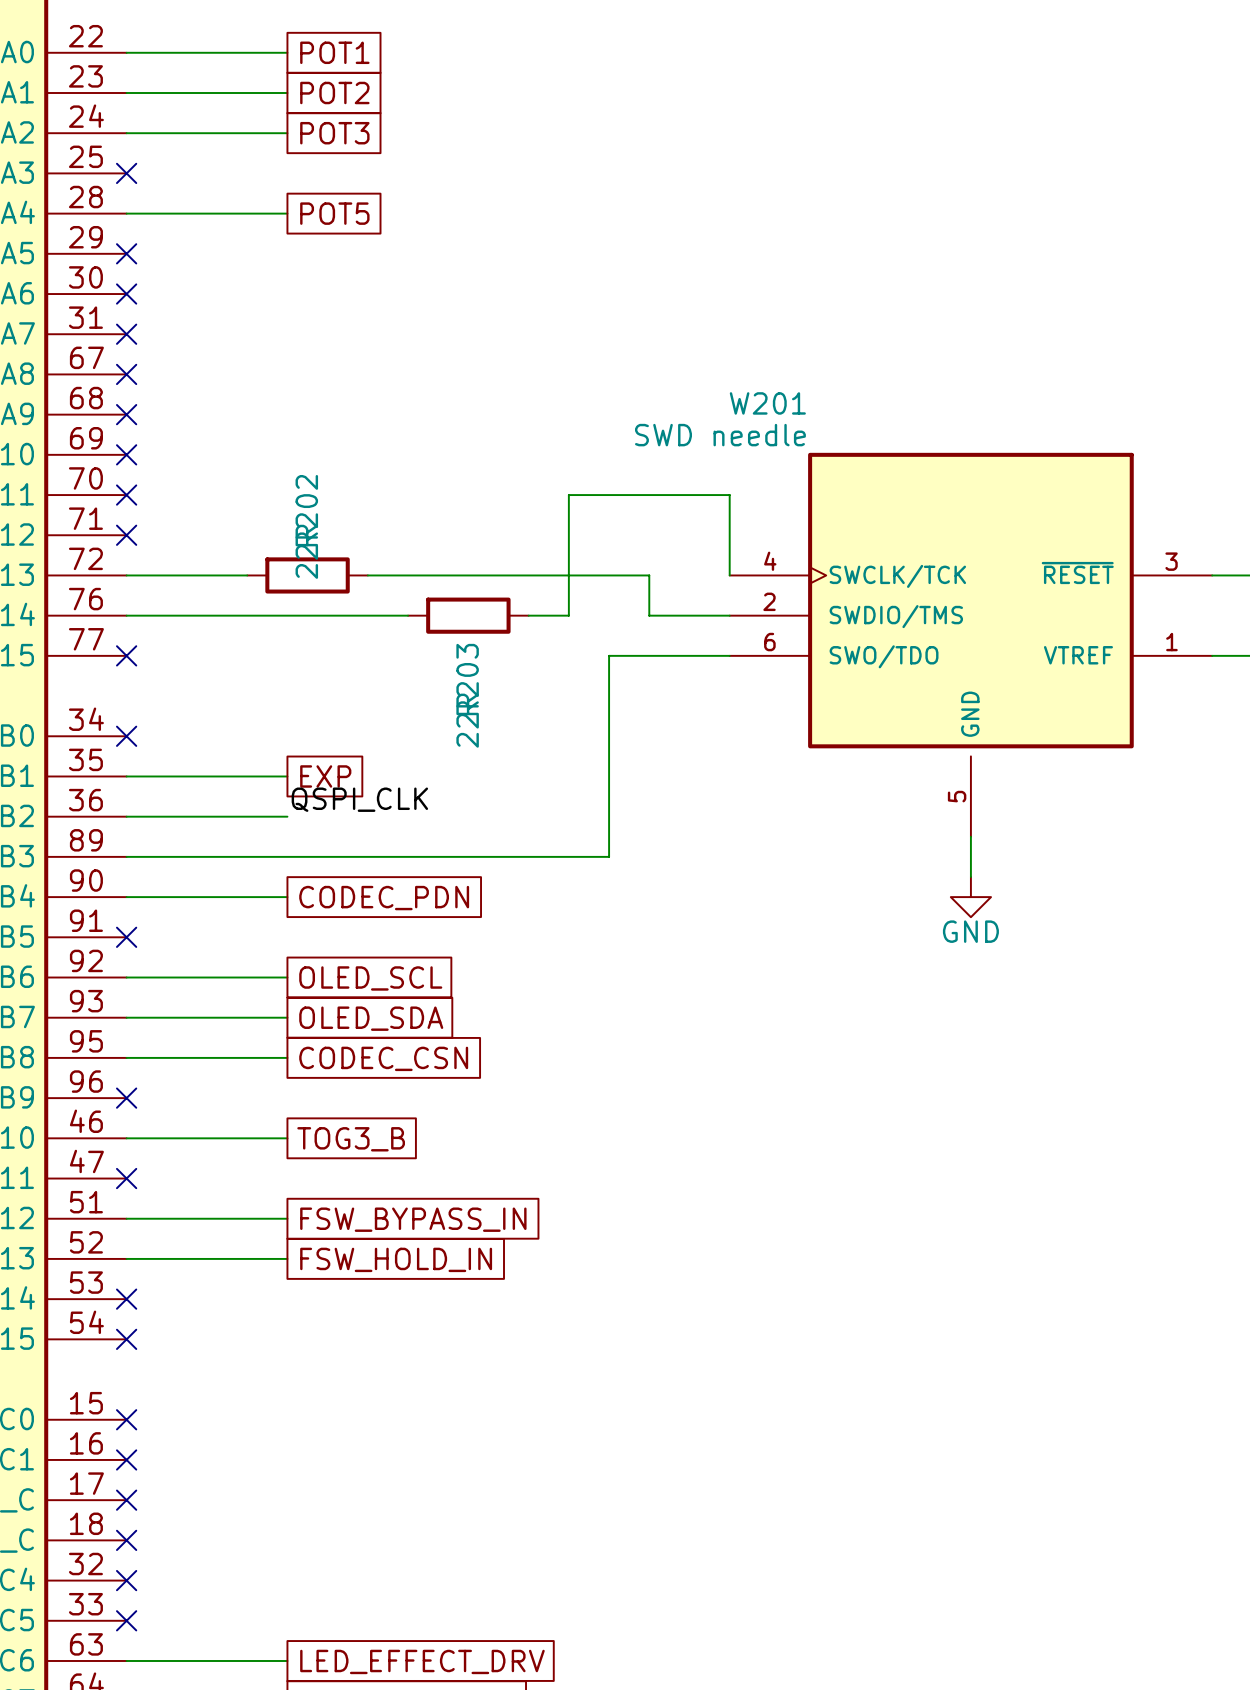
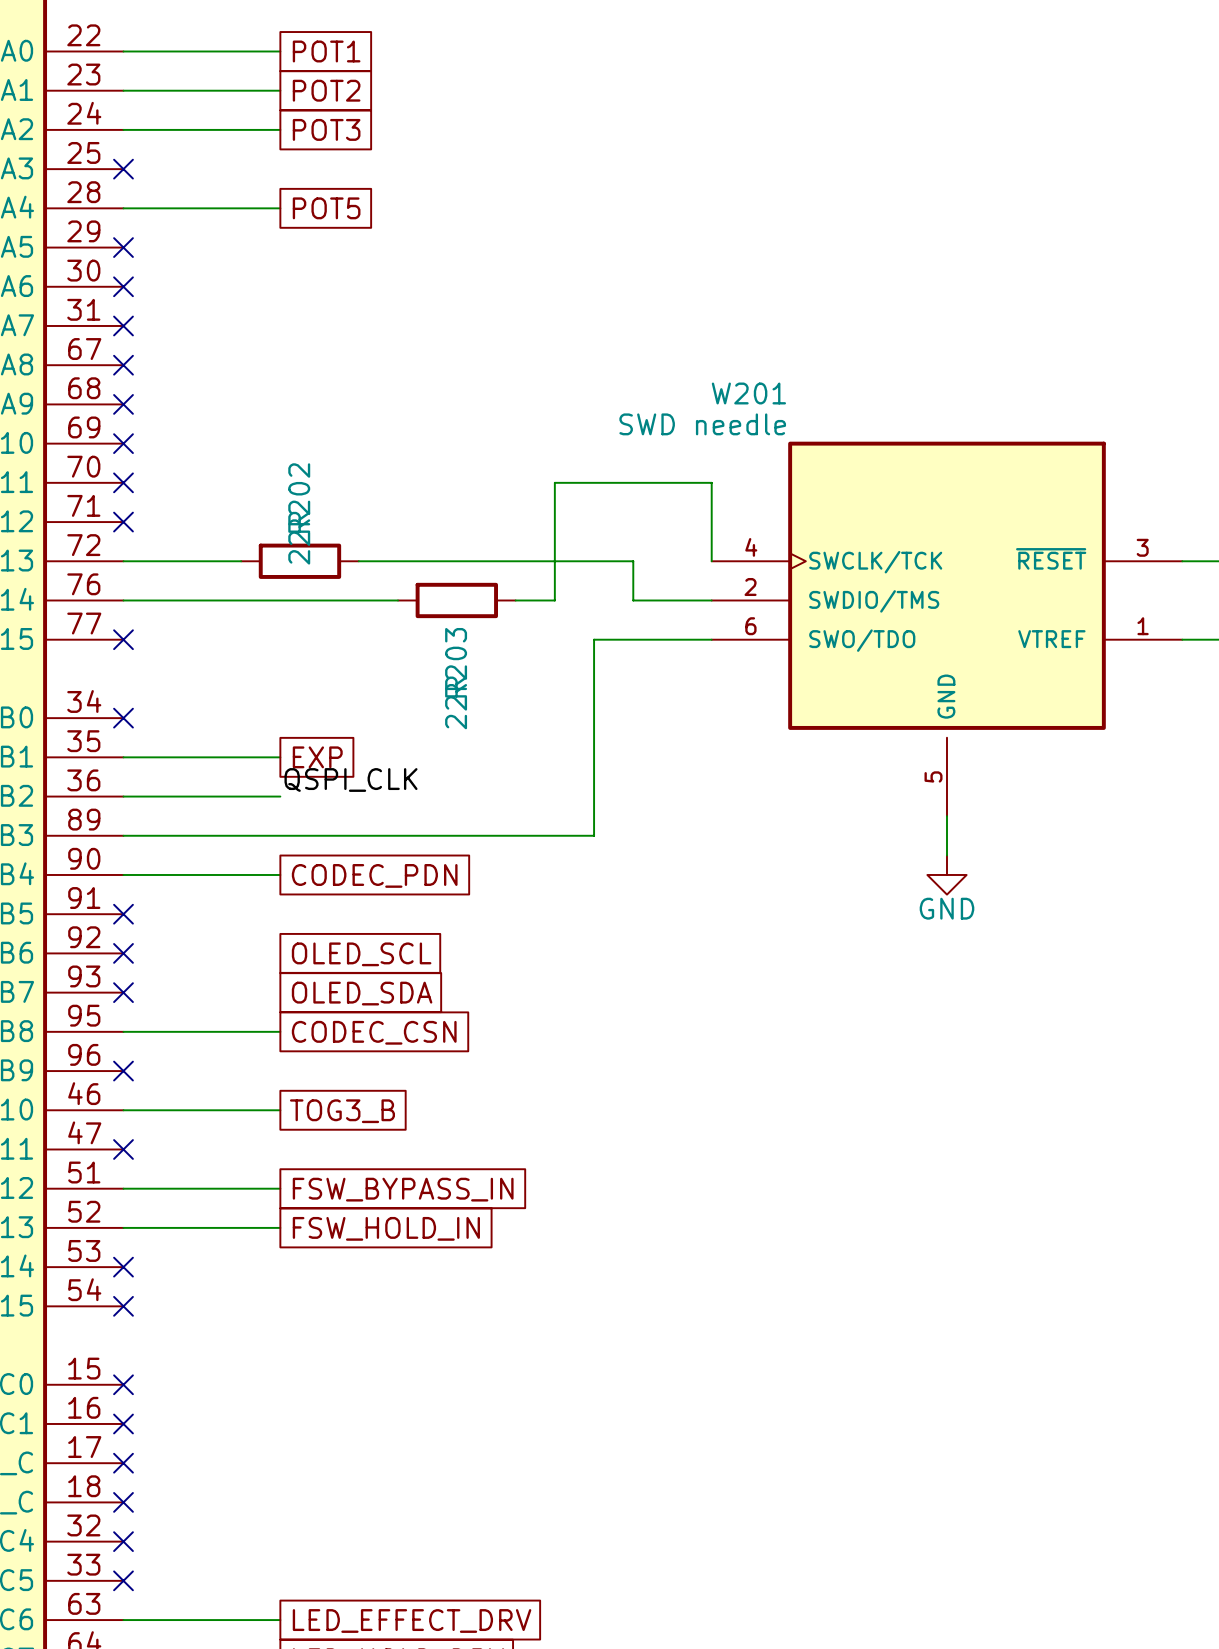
wire: (126, 977) (287, 977) -> none
no-connect mark: none -> (123, 953)
wire: (126, 1017) (287, 1017) -> none
no-connect mark: none -> (123, 992)

